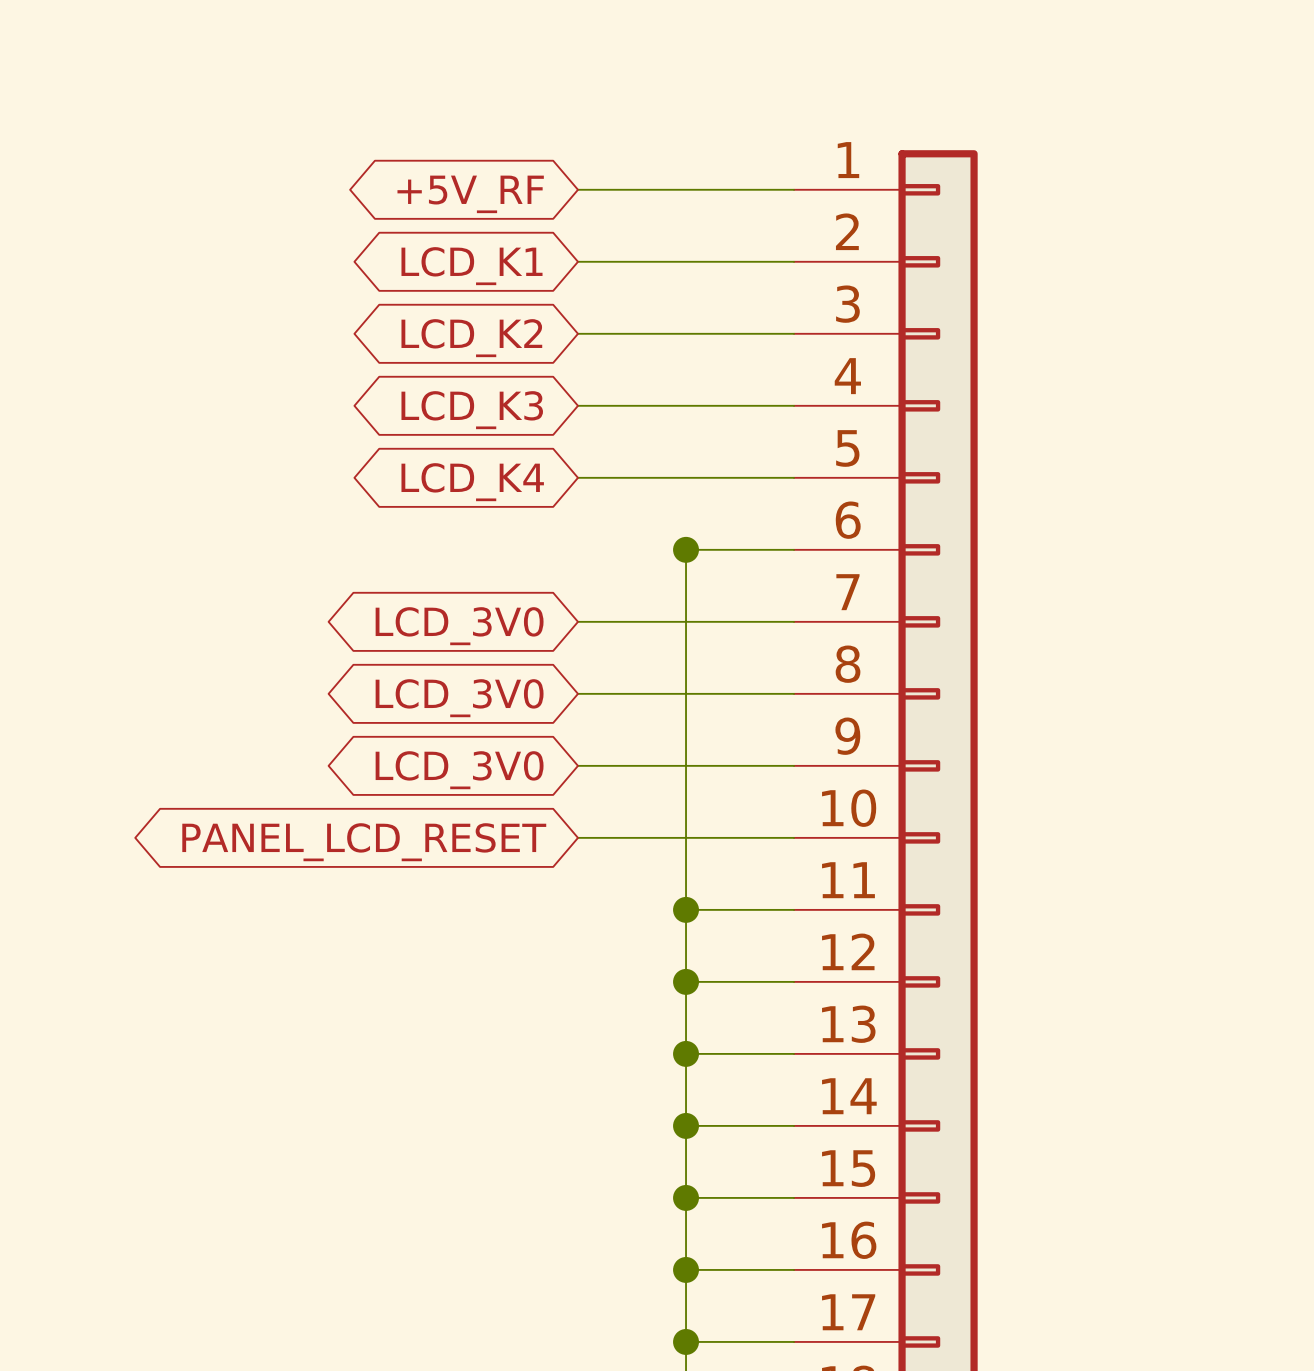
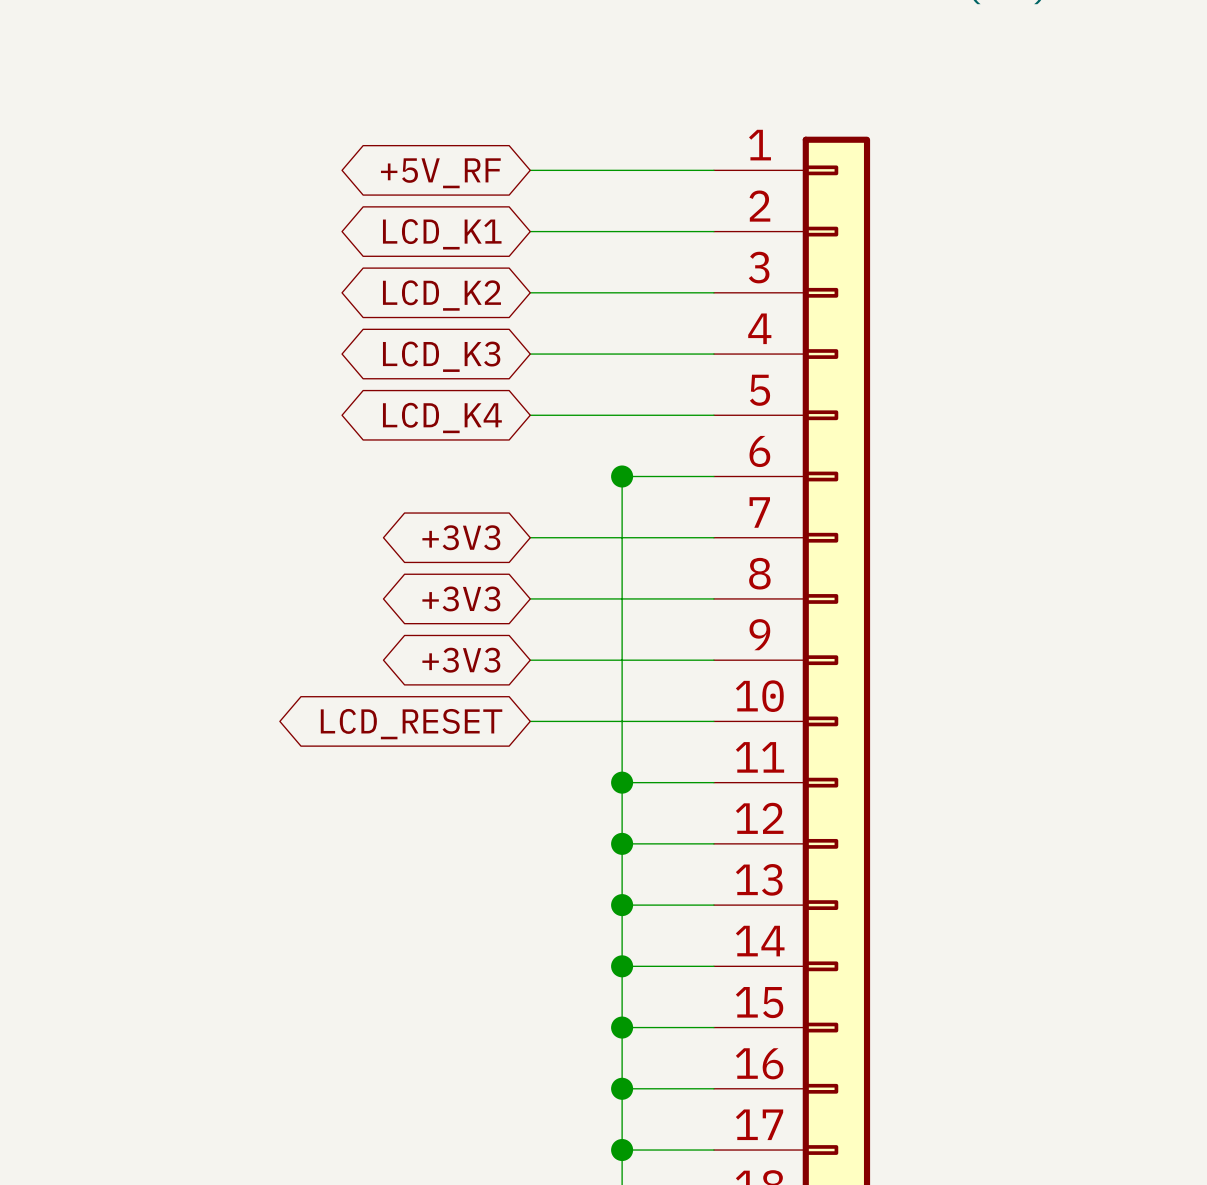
global label: LCD_3V0 (459, 626) -> +3V3 (461, 537)
global label: LCD_3V0 (459, 698) -> +3V3 (461, 598)
global label: LCD_3V0 (459, 770) -> +3V3 (461, 660)
global label: PANEL_LCD_RESET (364, 842) -> LCD_RESET (411, 724)

